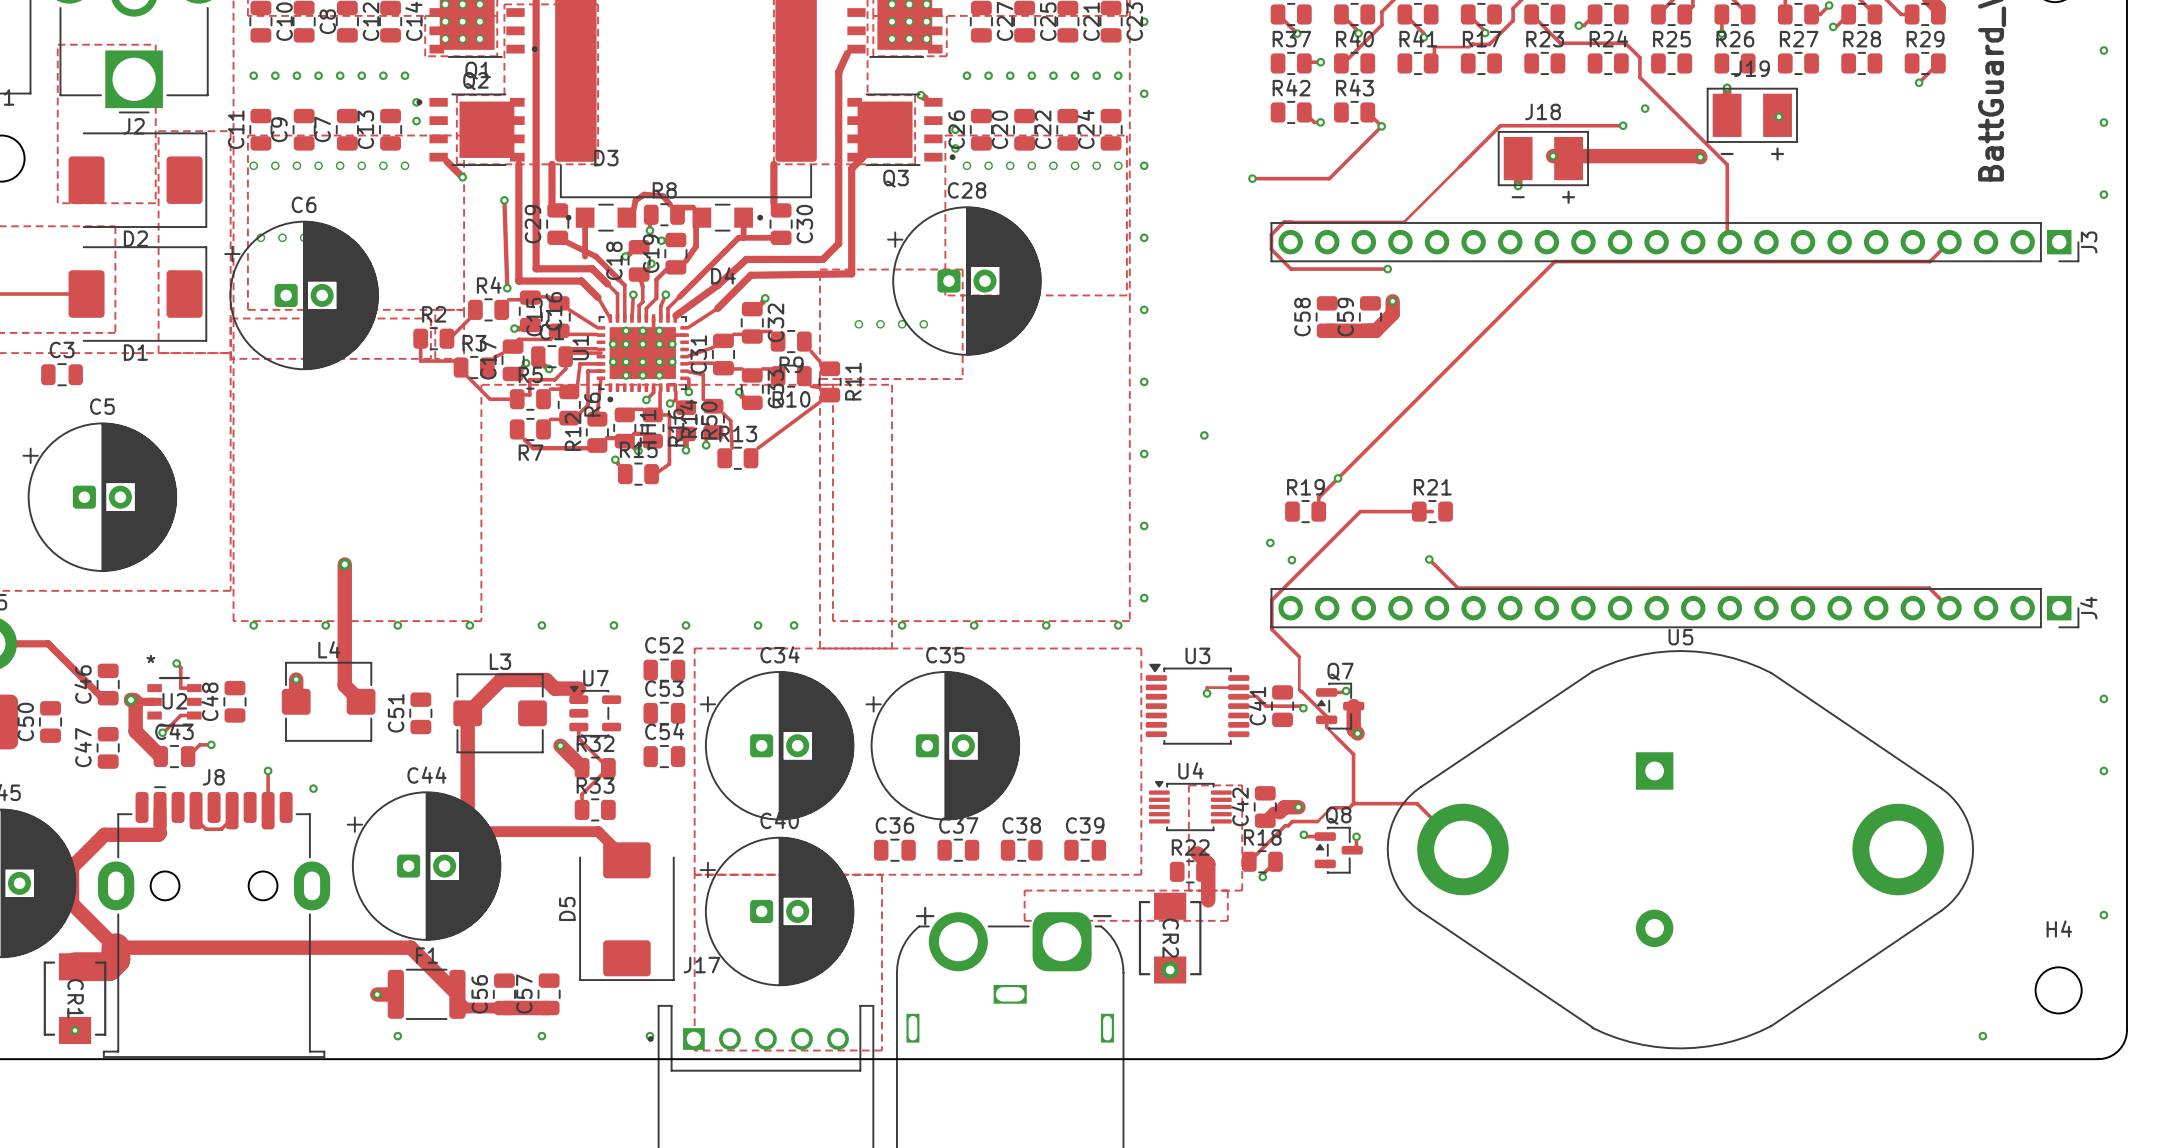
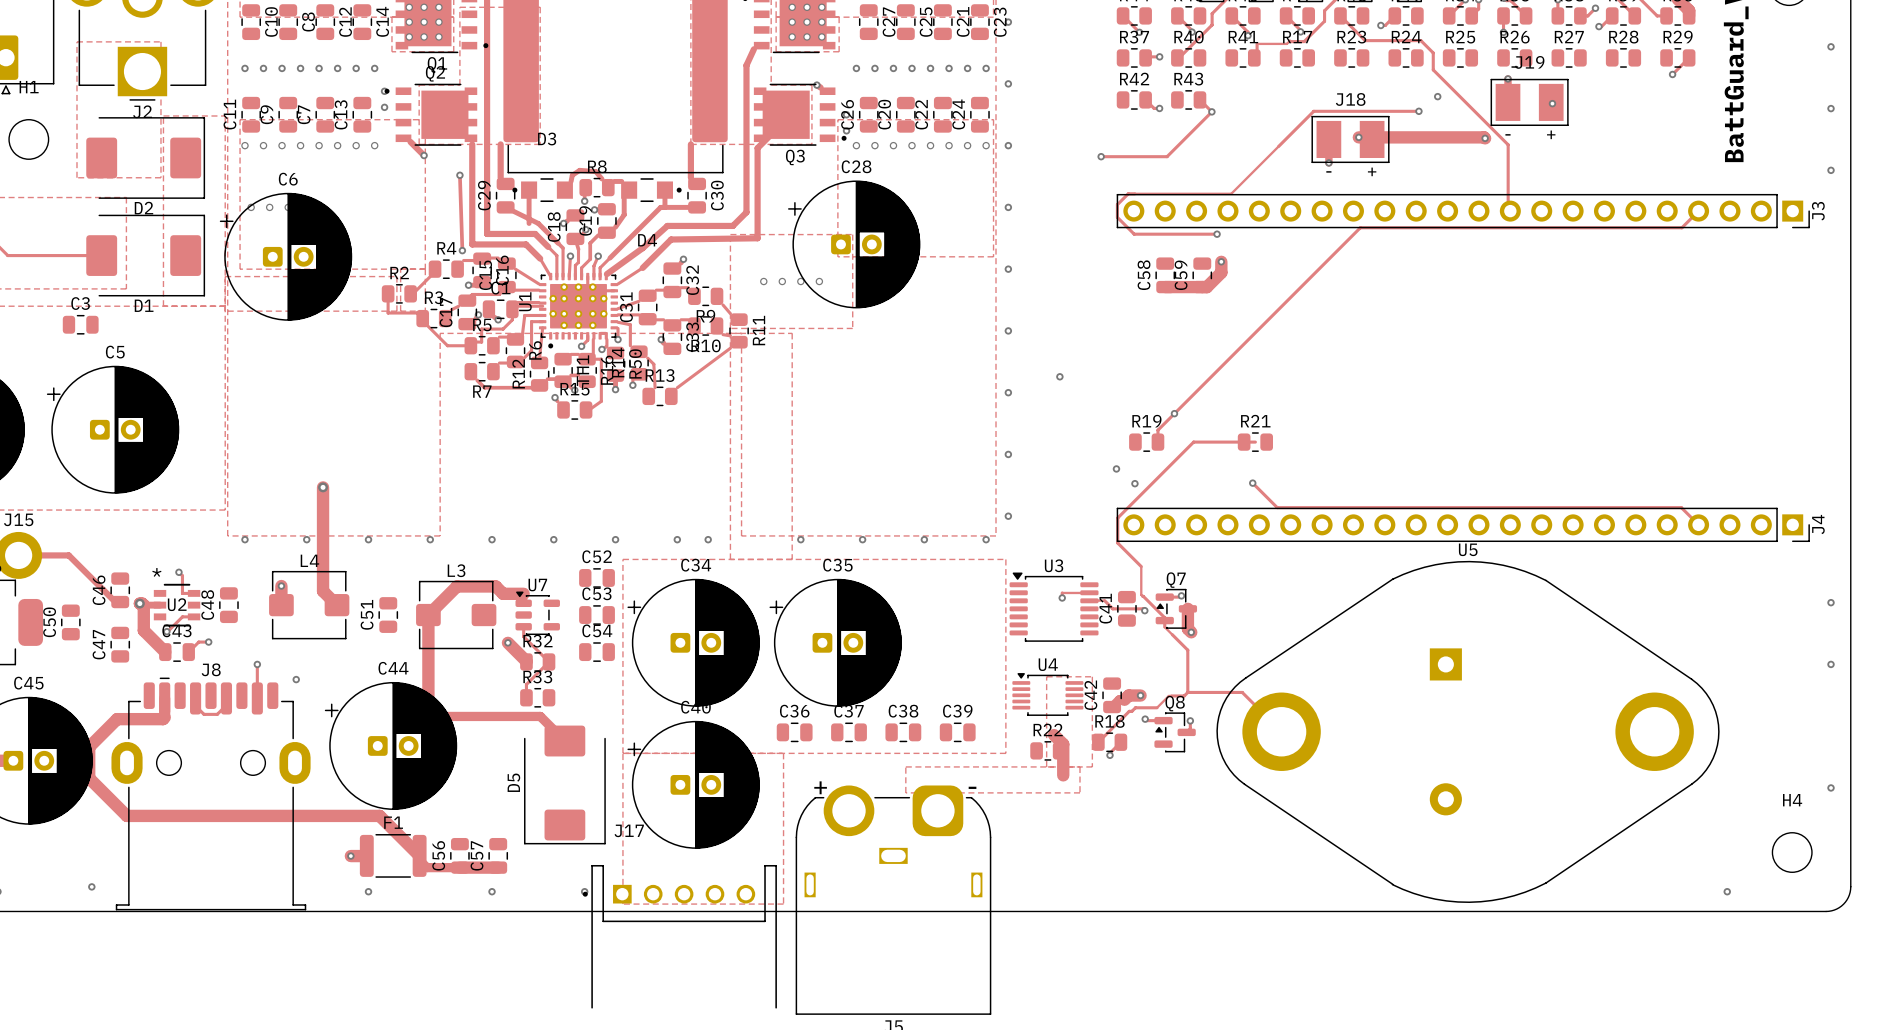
CR2: (1170, 938) -> none
track: (115, 947) (115, 959) (108, 966) (75, 966) -> none
via: (1170, 969) -> none
CR1: (75, 998) -> none

